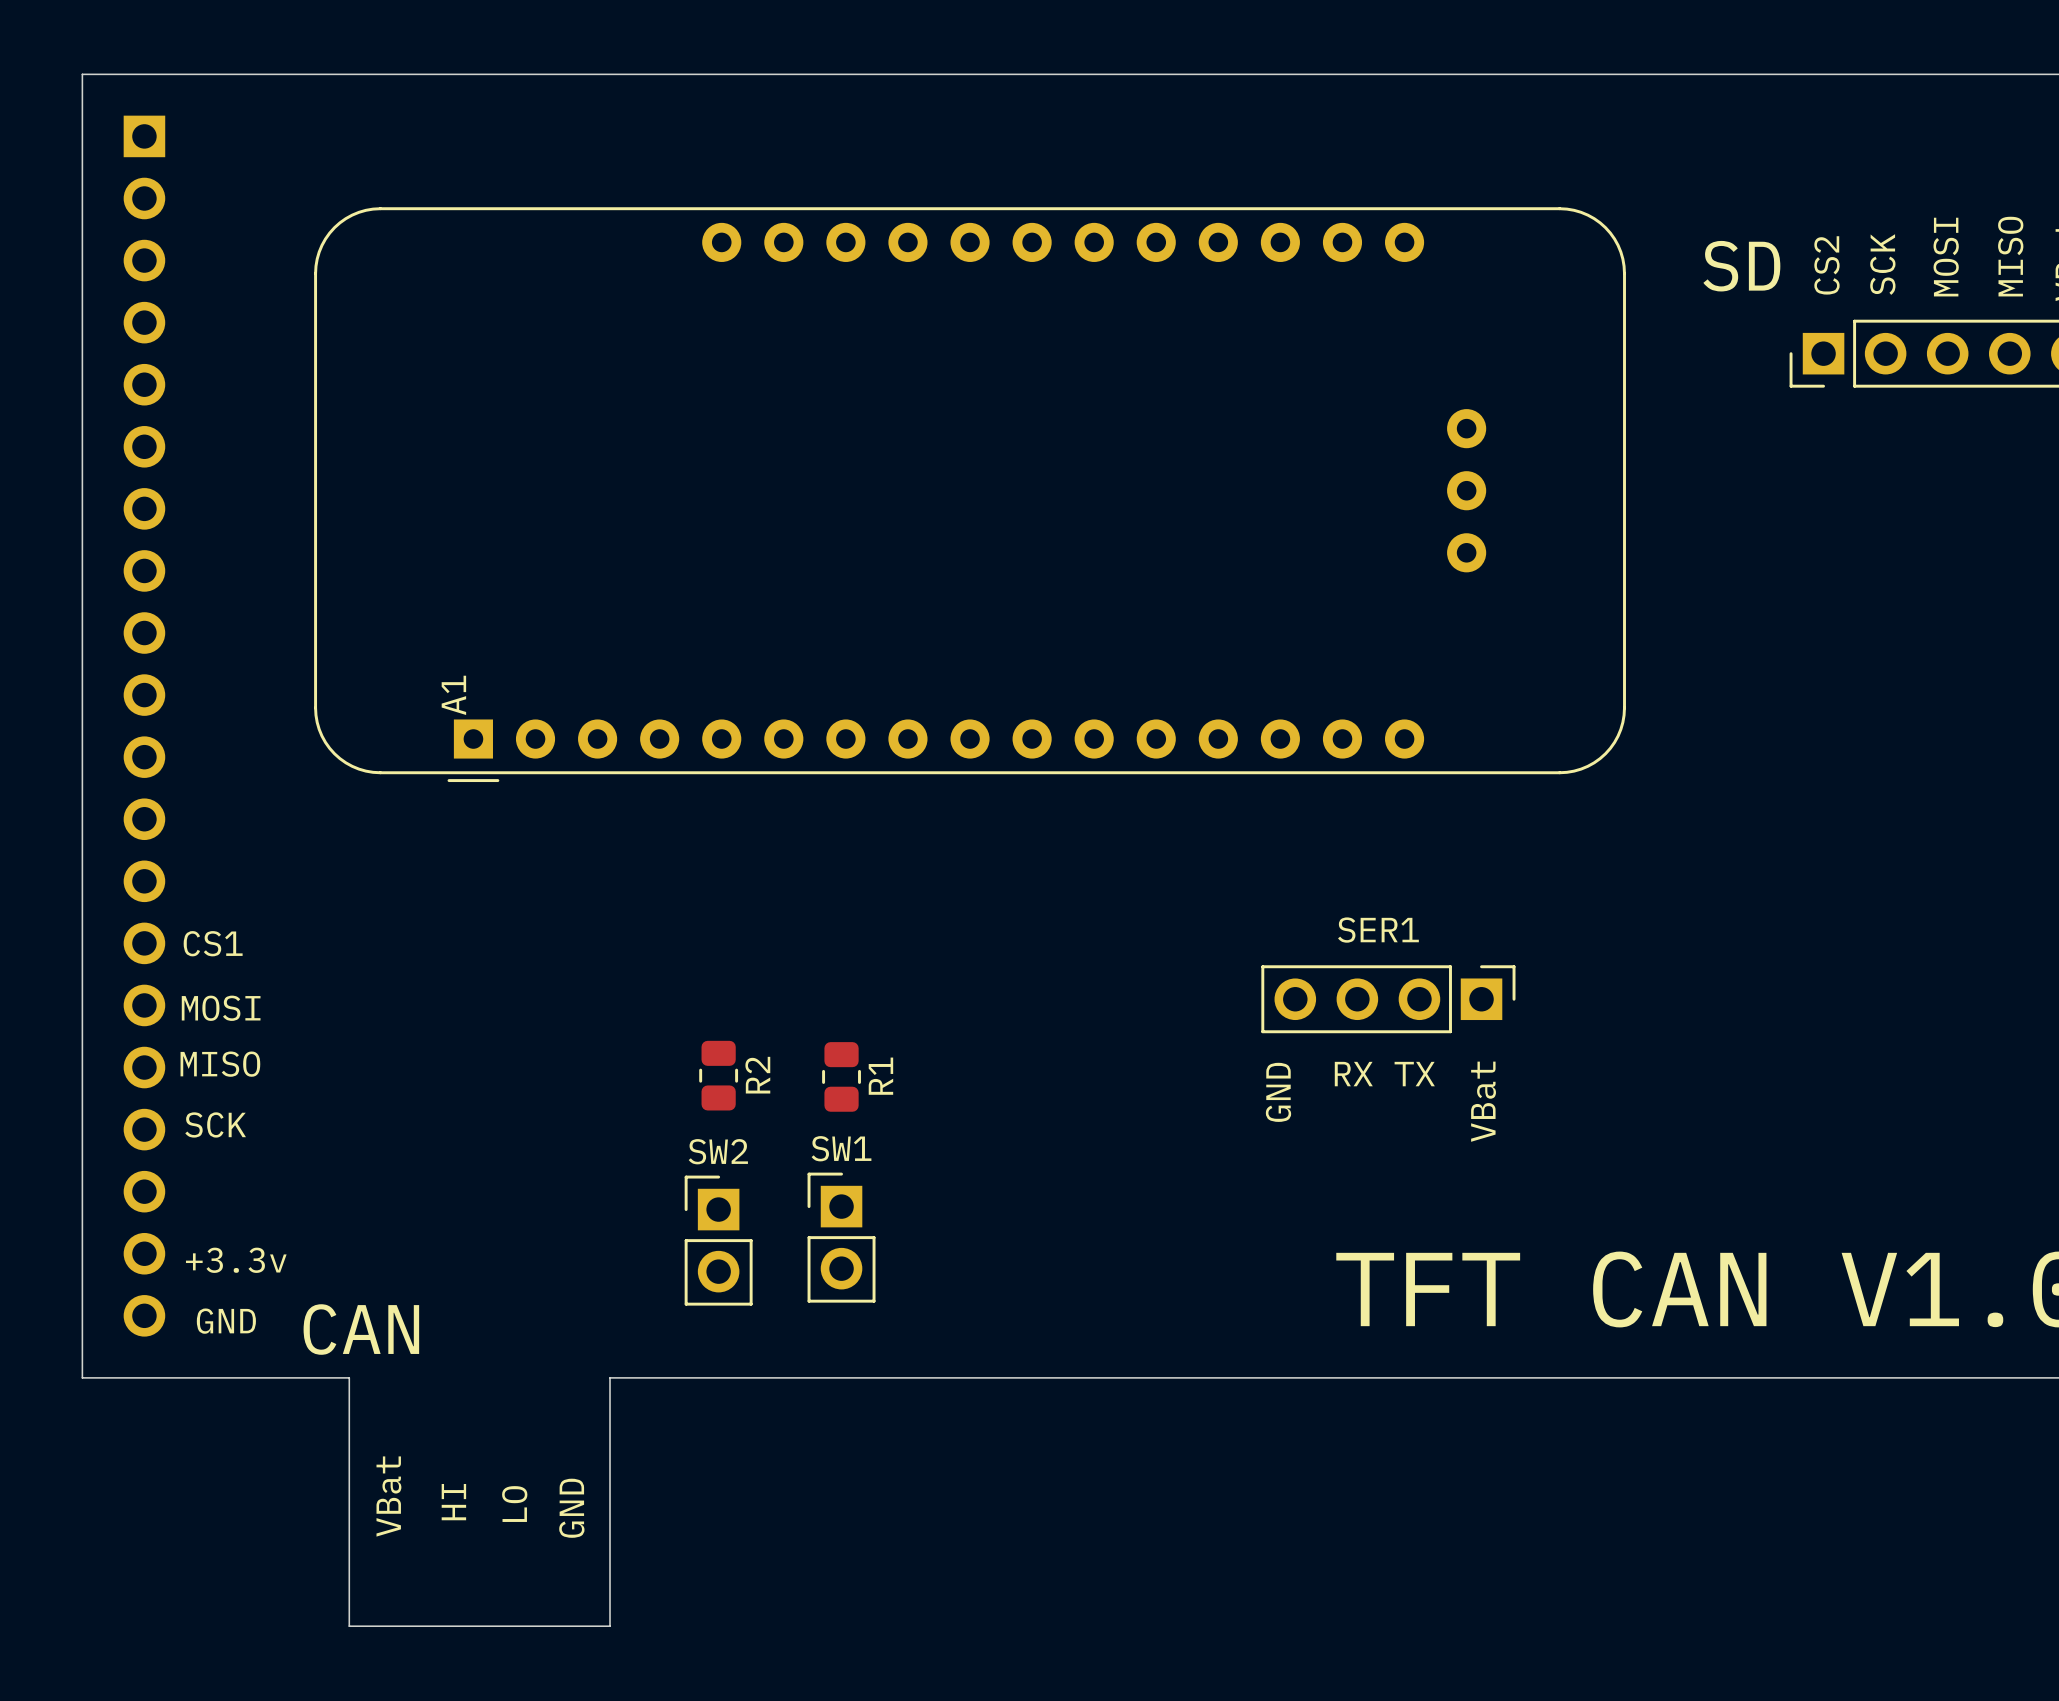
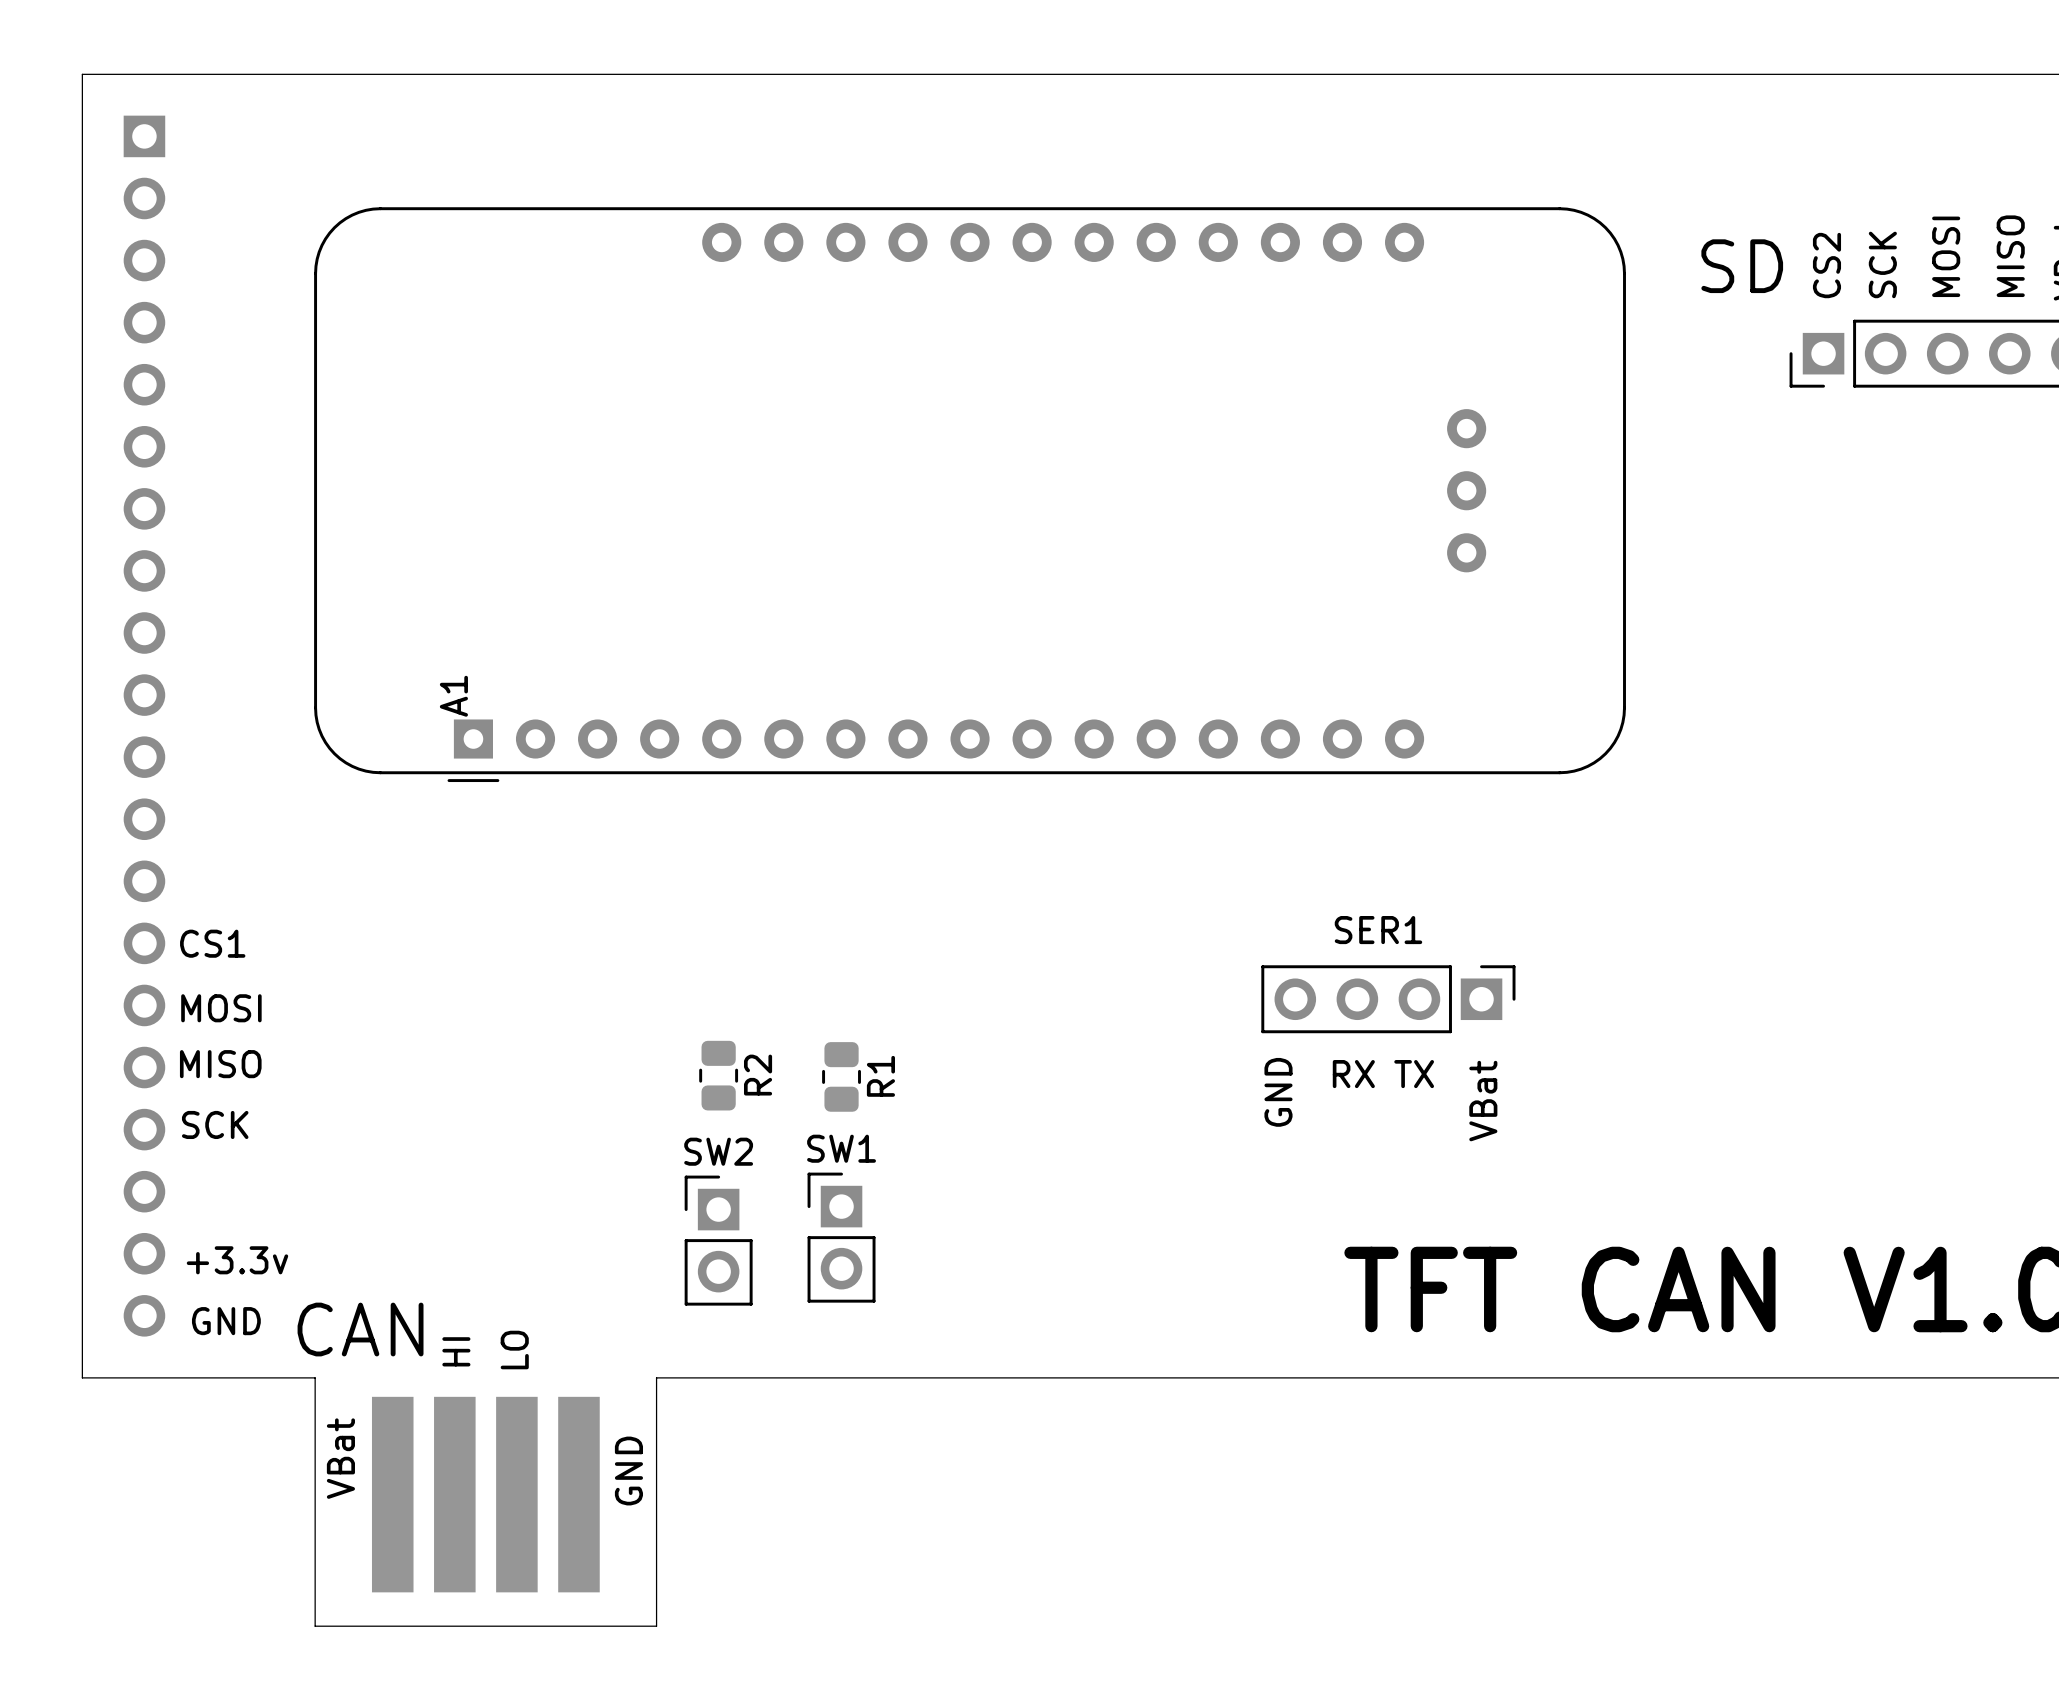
board edge: (315, 1377) (349, 1377) (349, 1626) -> (315, 1377) (315, 1626) (349, 1626)
board edge: (656, 1377) (610, 1377) (610, 1626) -> (656, 1377) (656, 1626) (610, 1626)
part: none -> (485, 1494)
text position: VBat (388, 1496) -> VBat (340, 1458)
text position: HI (453, 1502) -> HI (456, 1351)
text position: LO (514, 1504) -> LO (514, 1350)
text position: GND (571, 1508) -> GND (628, 1471)

